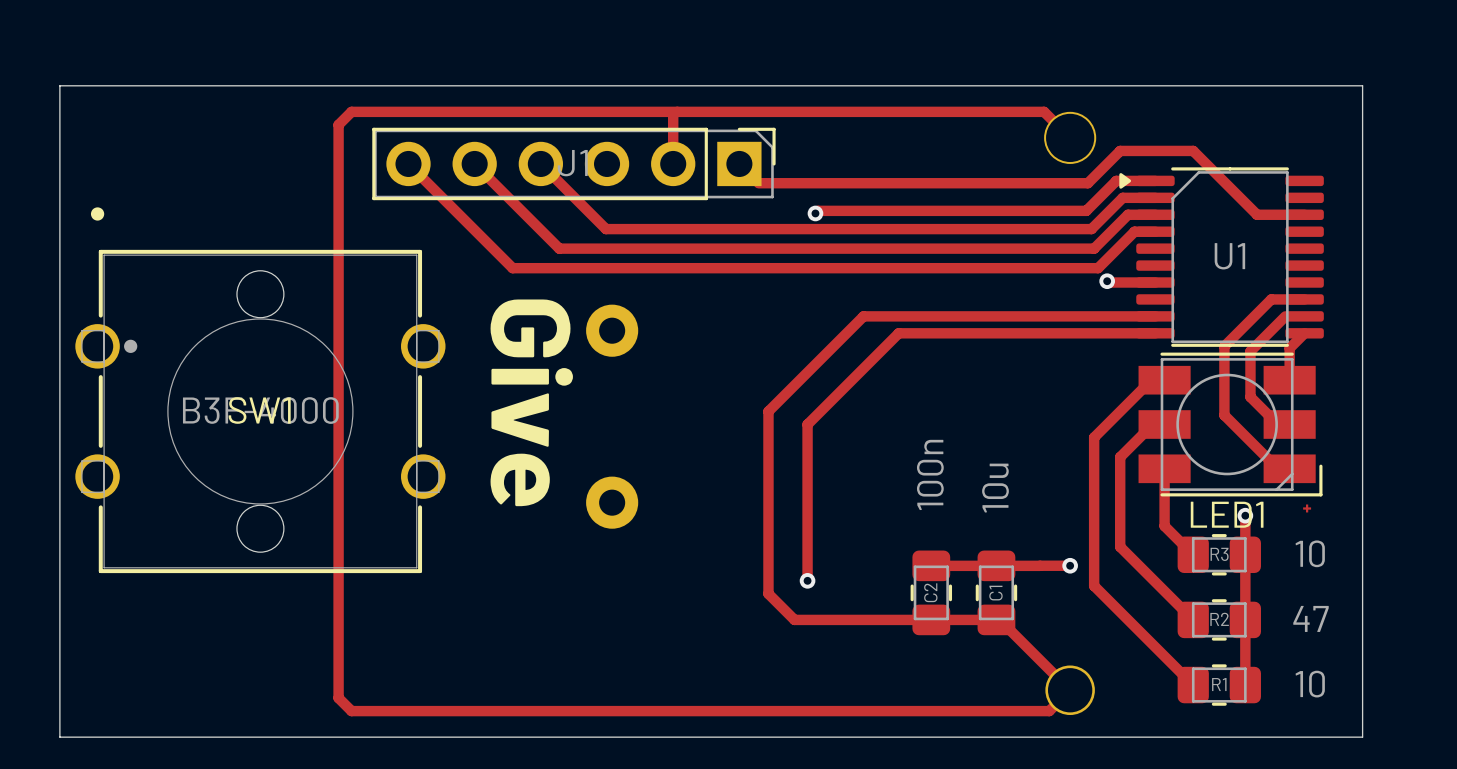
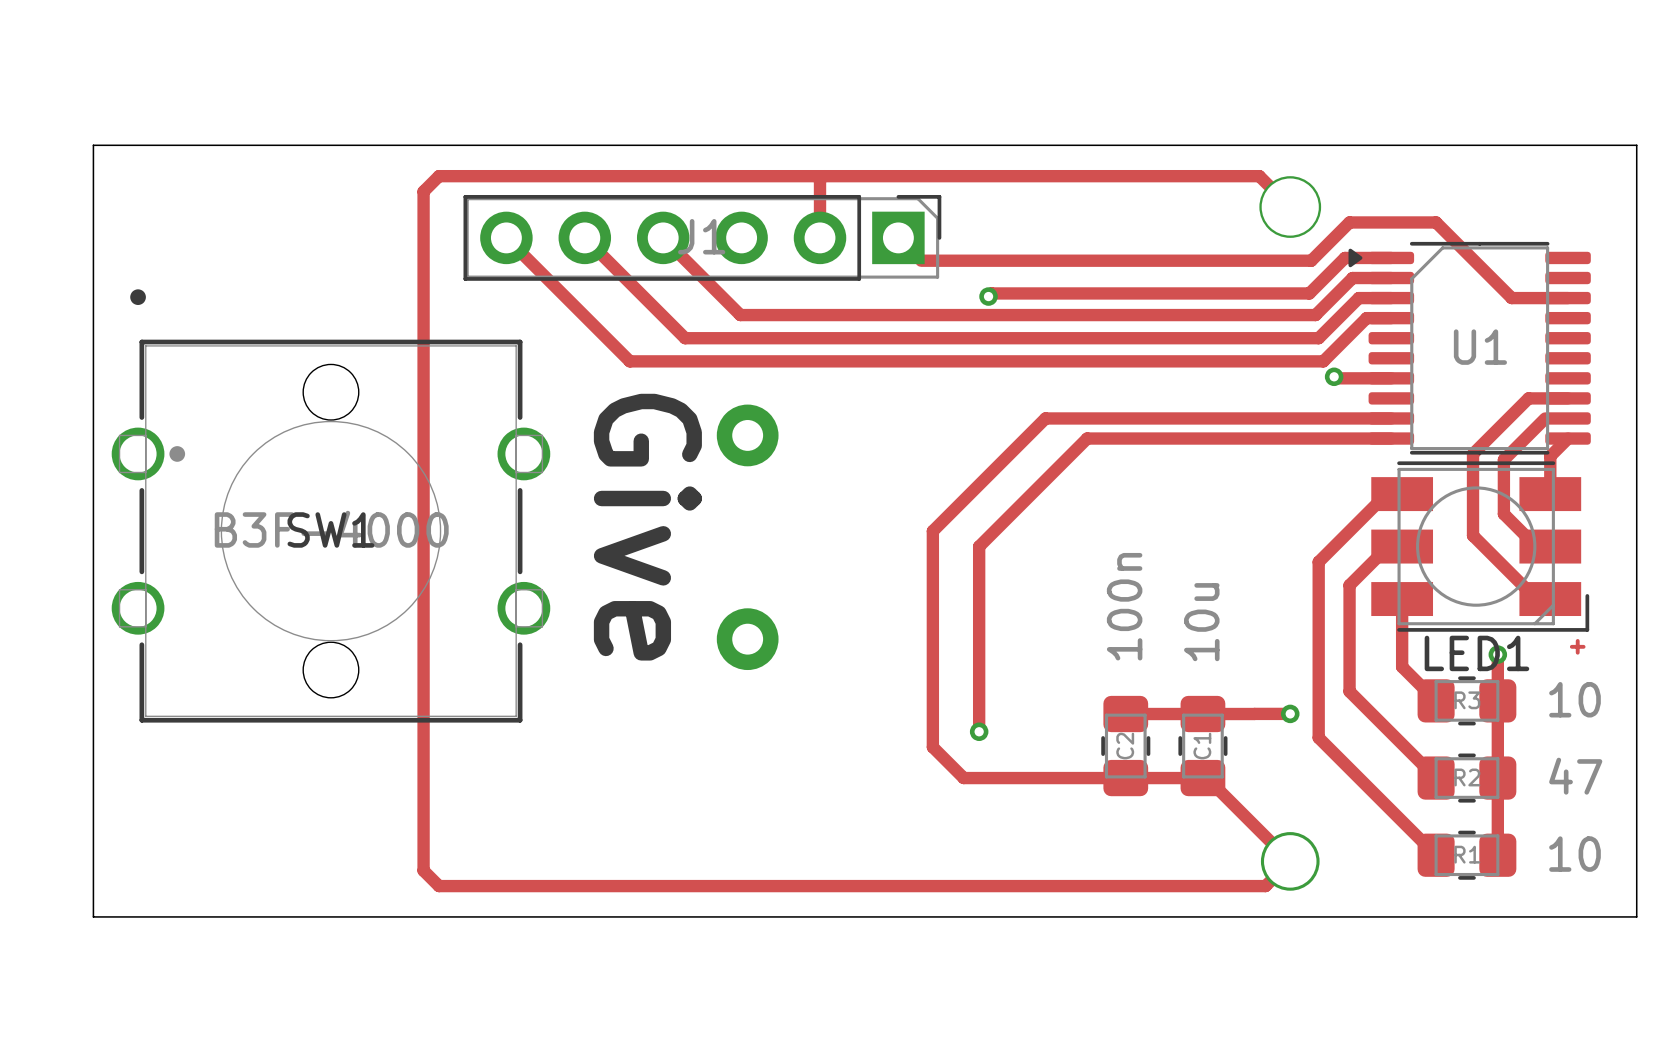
text position: Give (531, 402) -> Give (647, 527)

